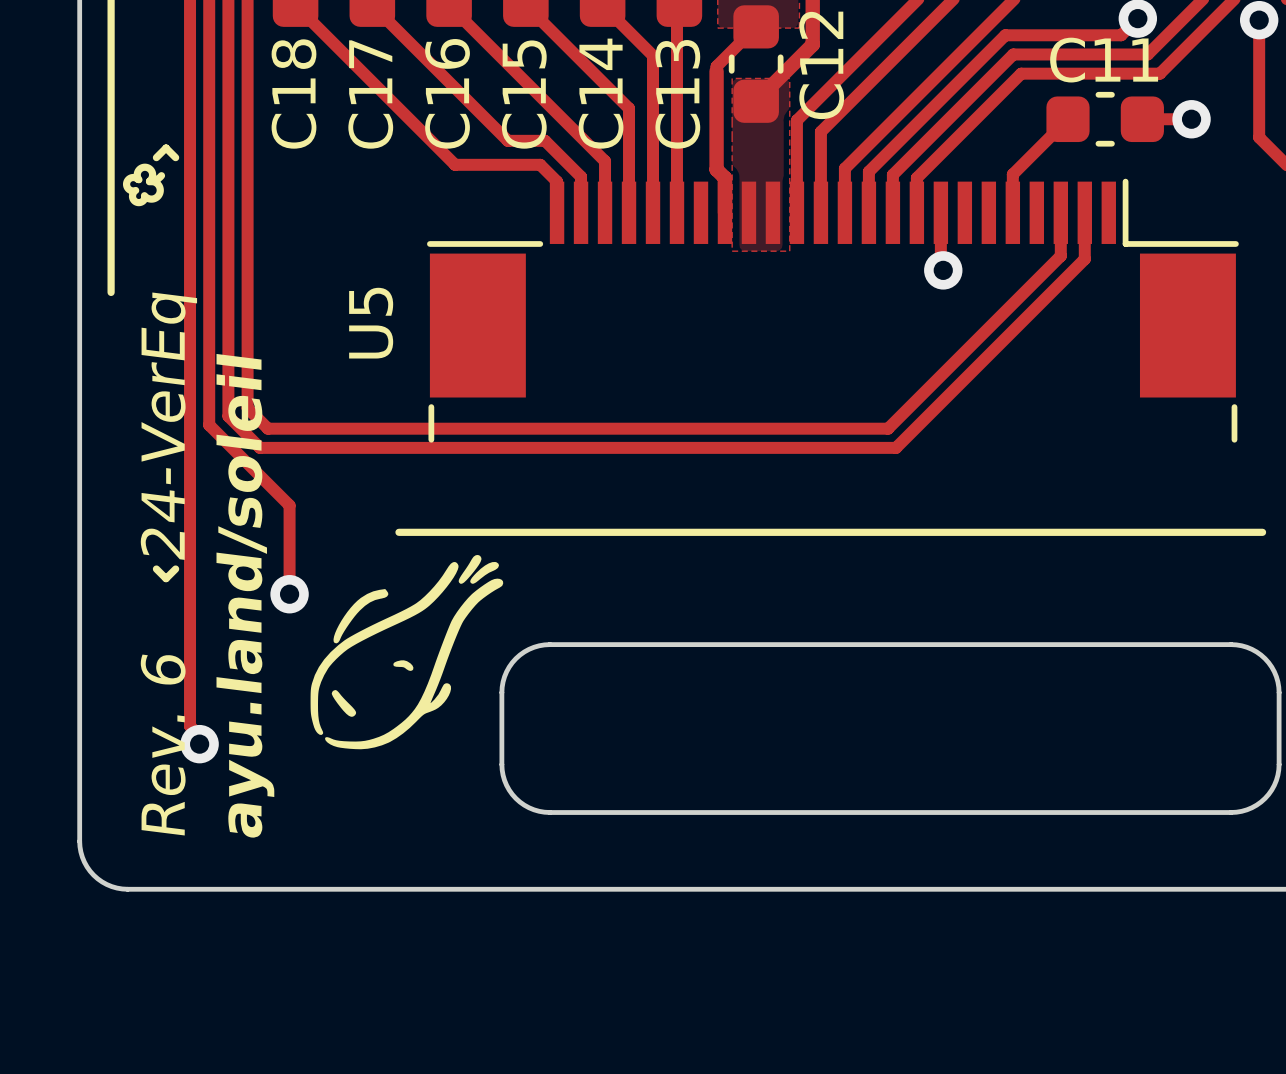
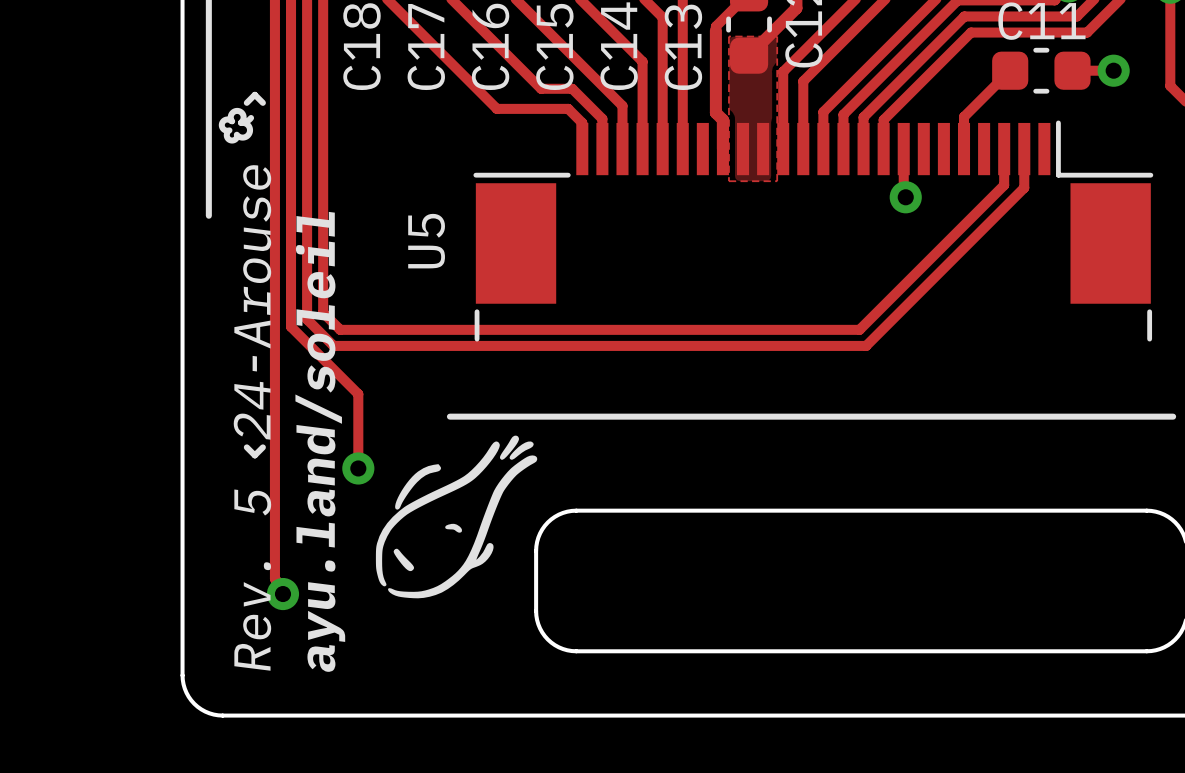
text: 24-VerEq (168, 426) -> 24-Arouse (252, 302)
text: Rev. 6 (163, 744) -> Rev. 5 (252, 580)

